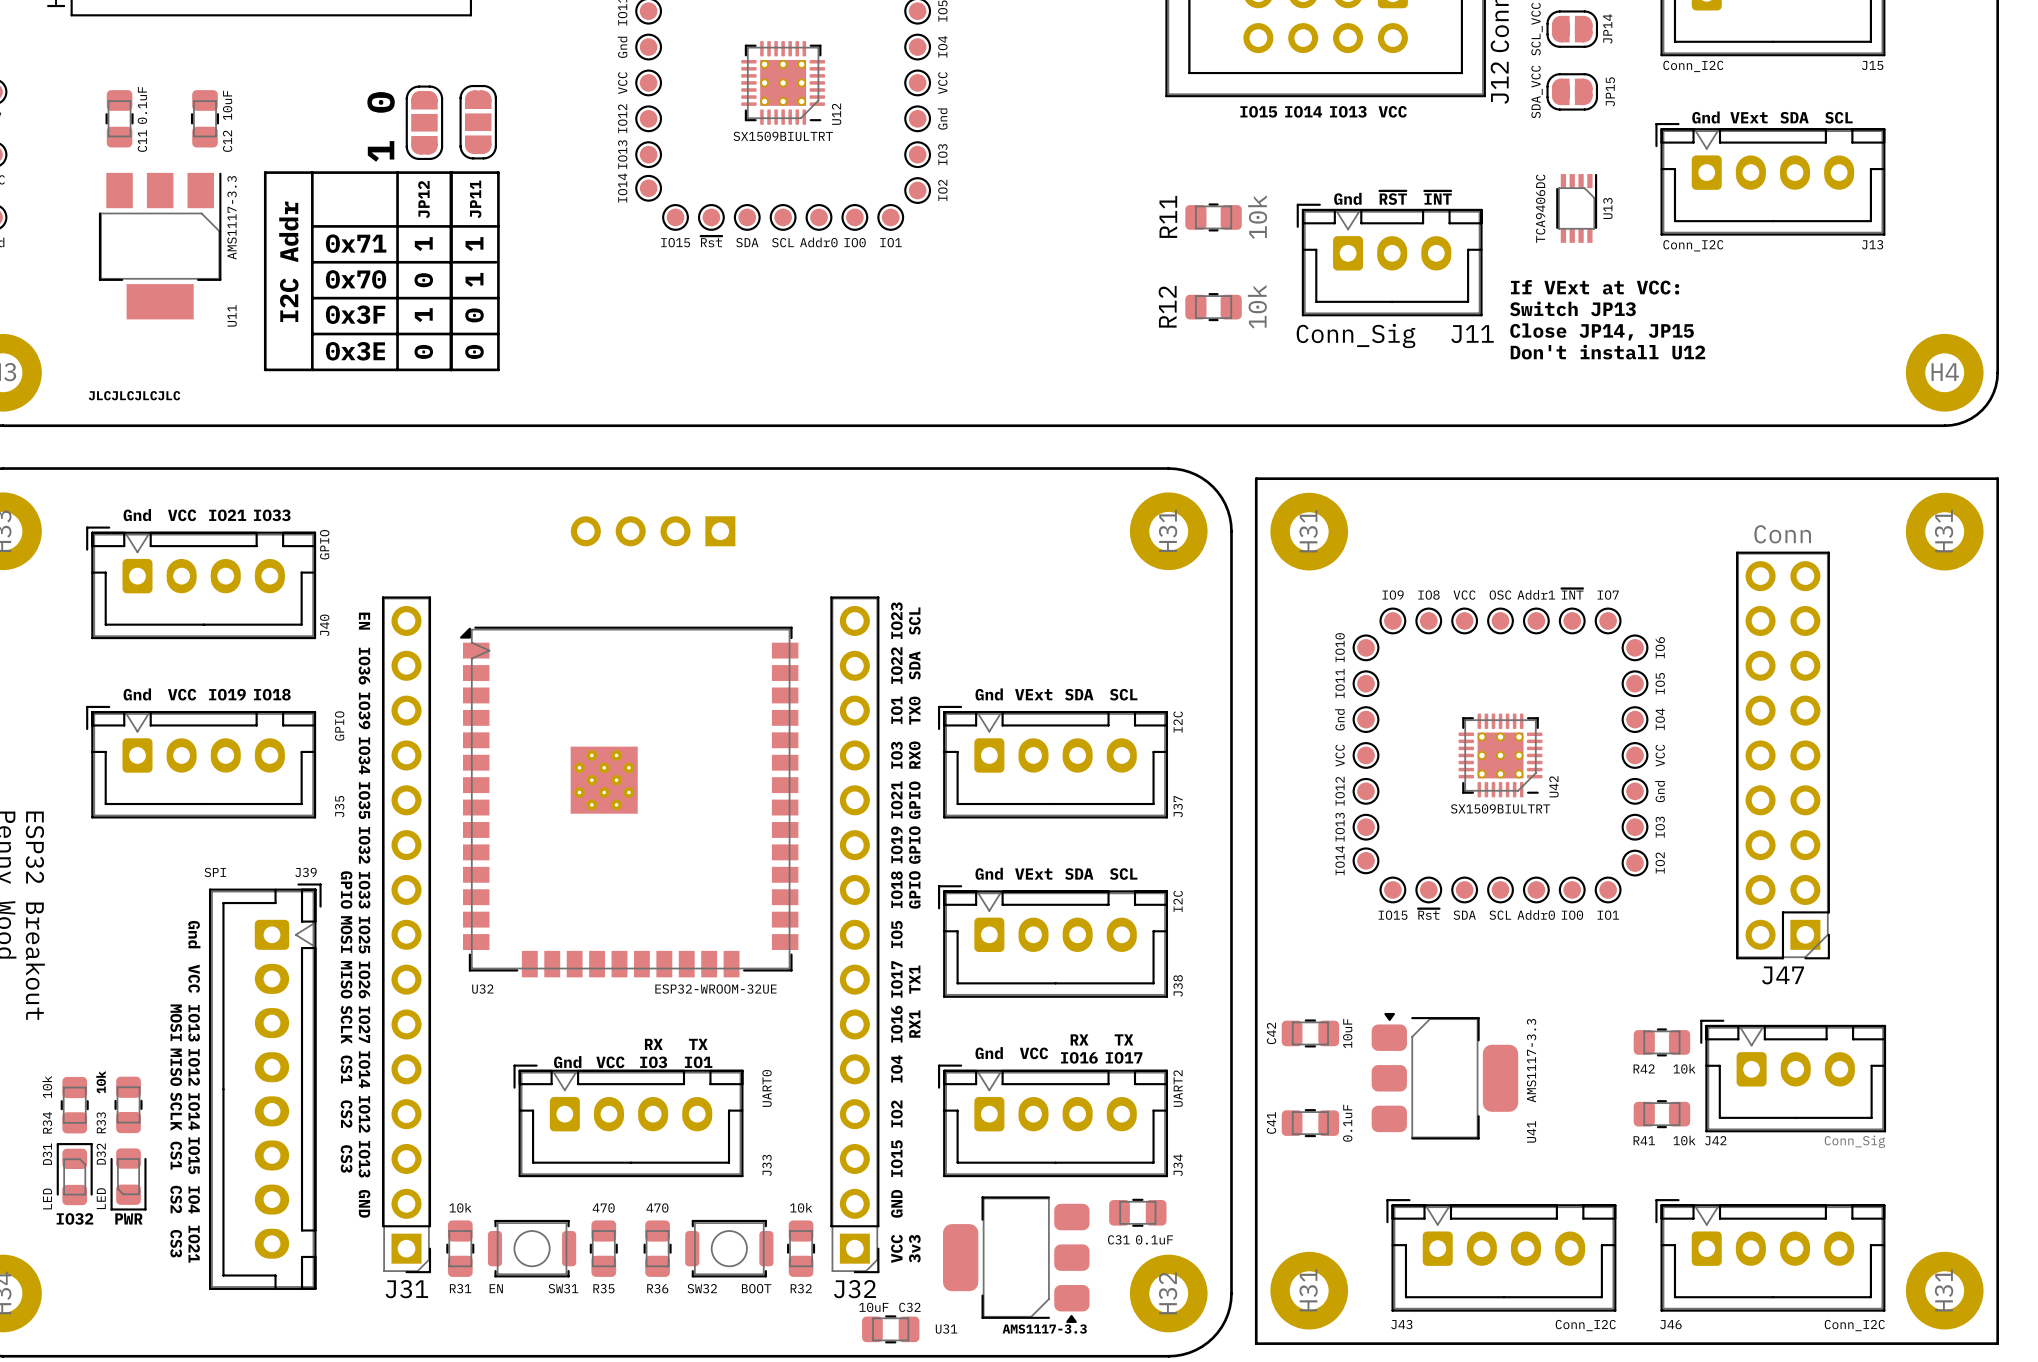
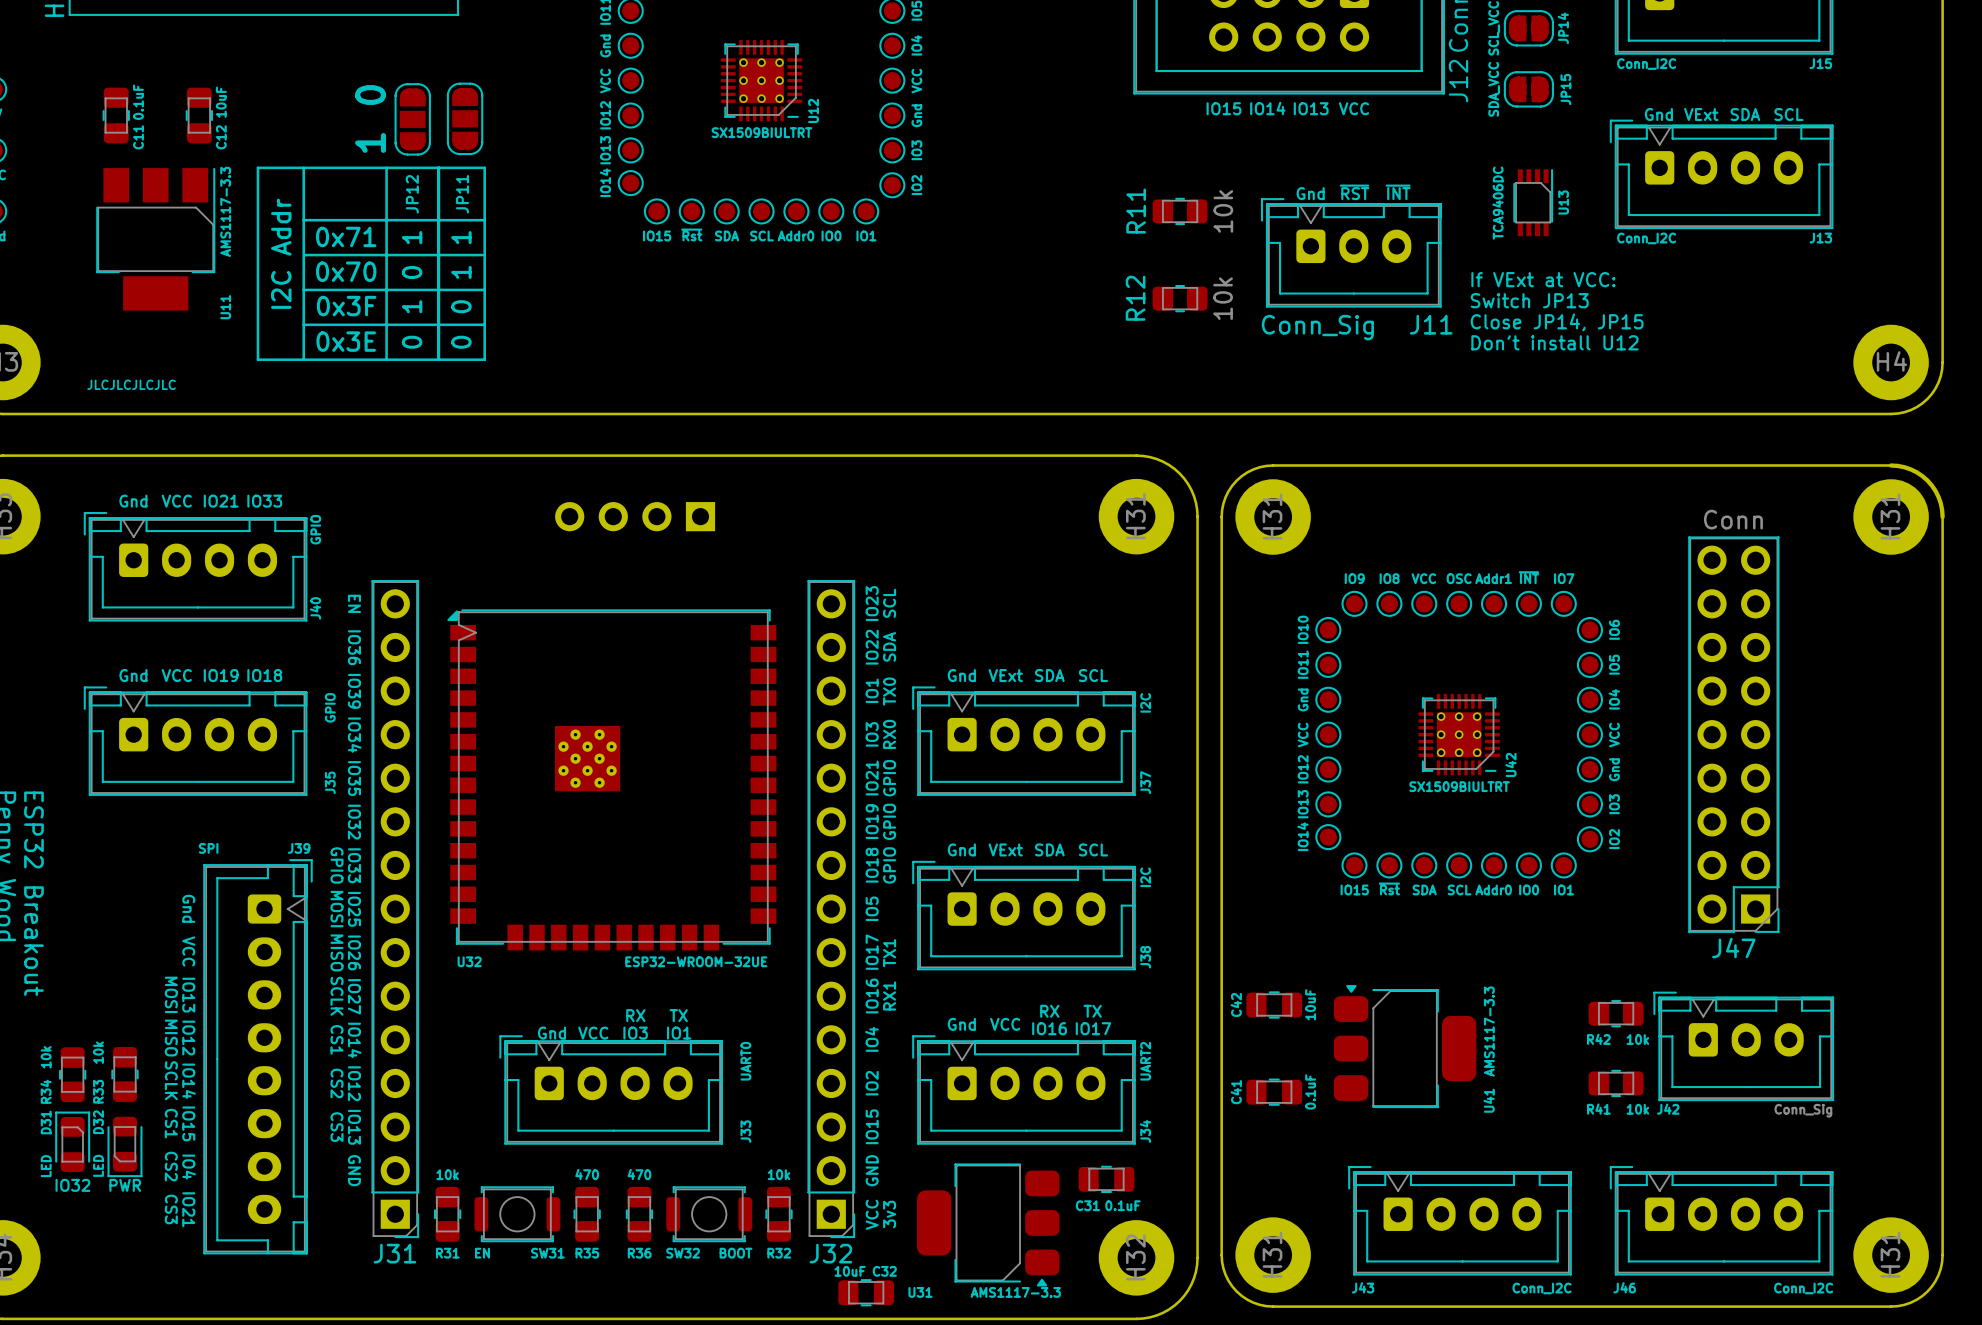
board edge: (1309, 478) (1256, 478) (1256, 531) -> (1273, 465) (1253, 469) (1236, 480) (1225, 497) (1221, 516)
board edge: (1944, 478) (1997, 478) (1997, 531) -> (1891, 465) (1910, 469) (1927, 480) (1938, 497) (1942, 516)
board edge: (1256, 1290) (1256, 1343) (1309, 1343) -> (1221, 1255) (1225, 1274) (1236, 1291) (1253, 1302) (1273, 1306)
board edge: (1997, 1290) (1997, 1343) (1944, 1343) -> (1942, 1255) (1938, 1274) (1927, 1291) (1910, 1302) (1891, 1306)

